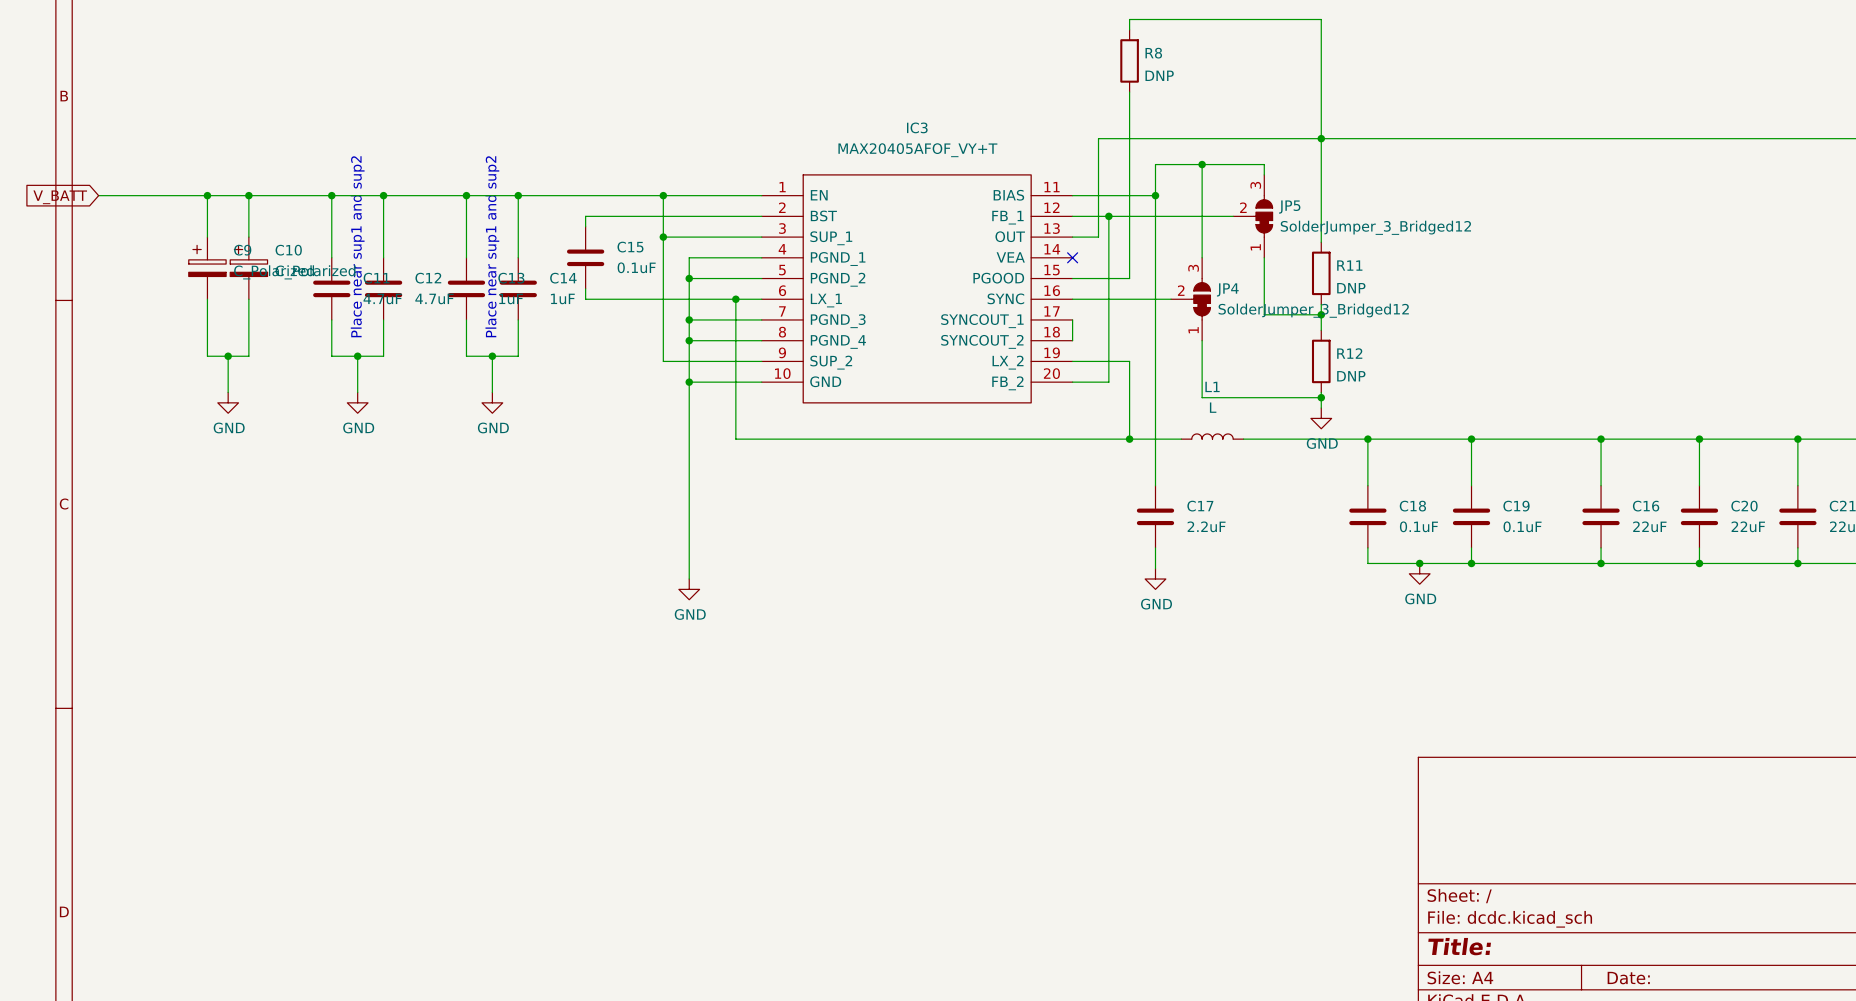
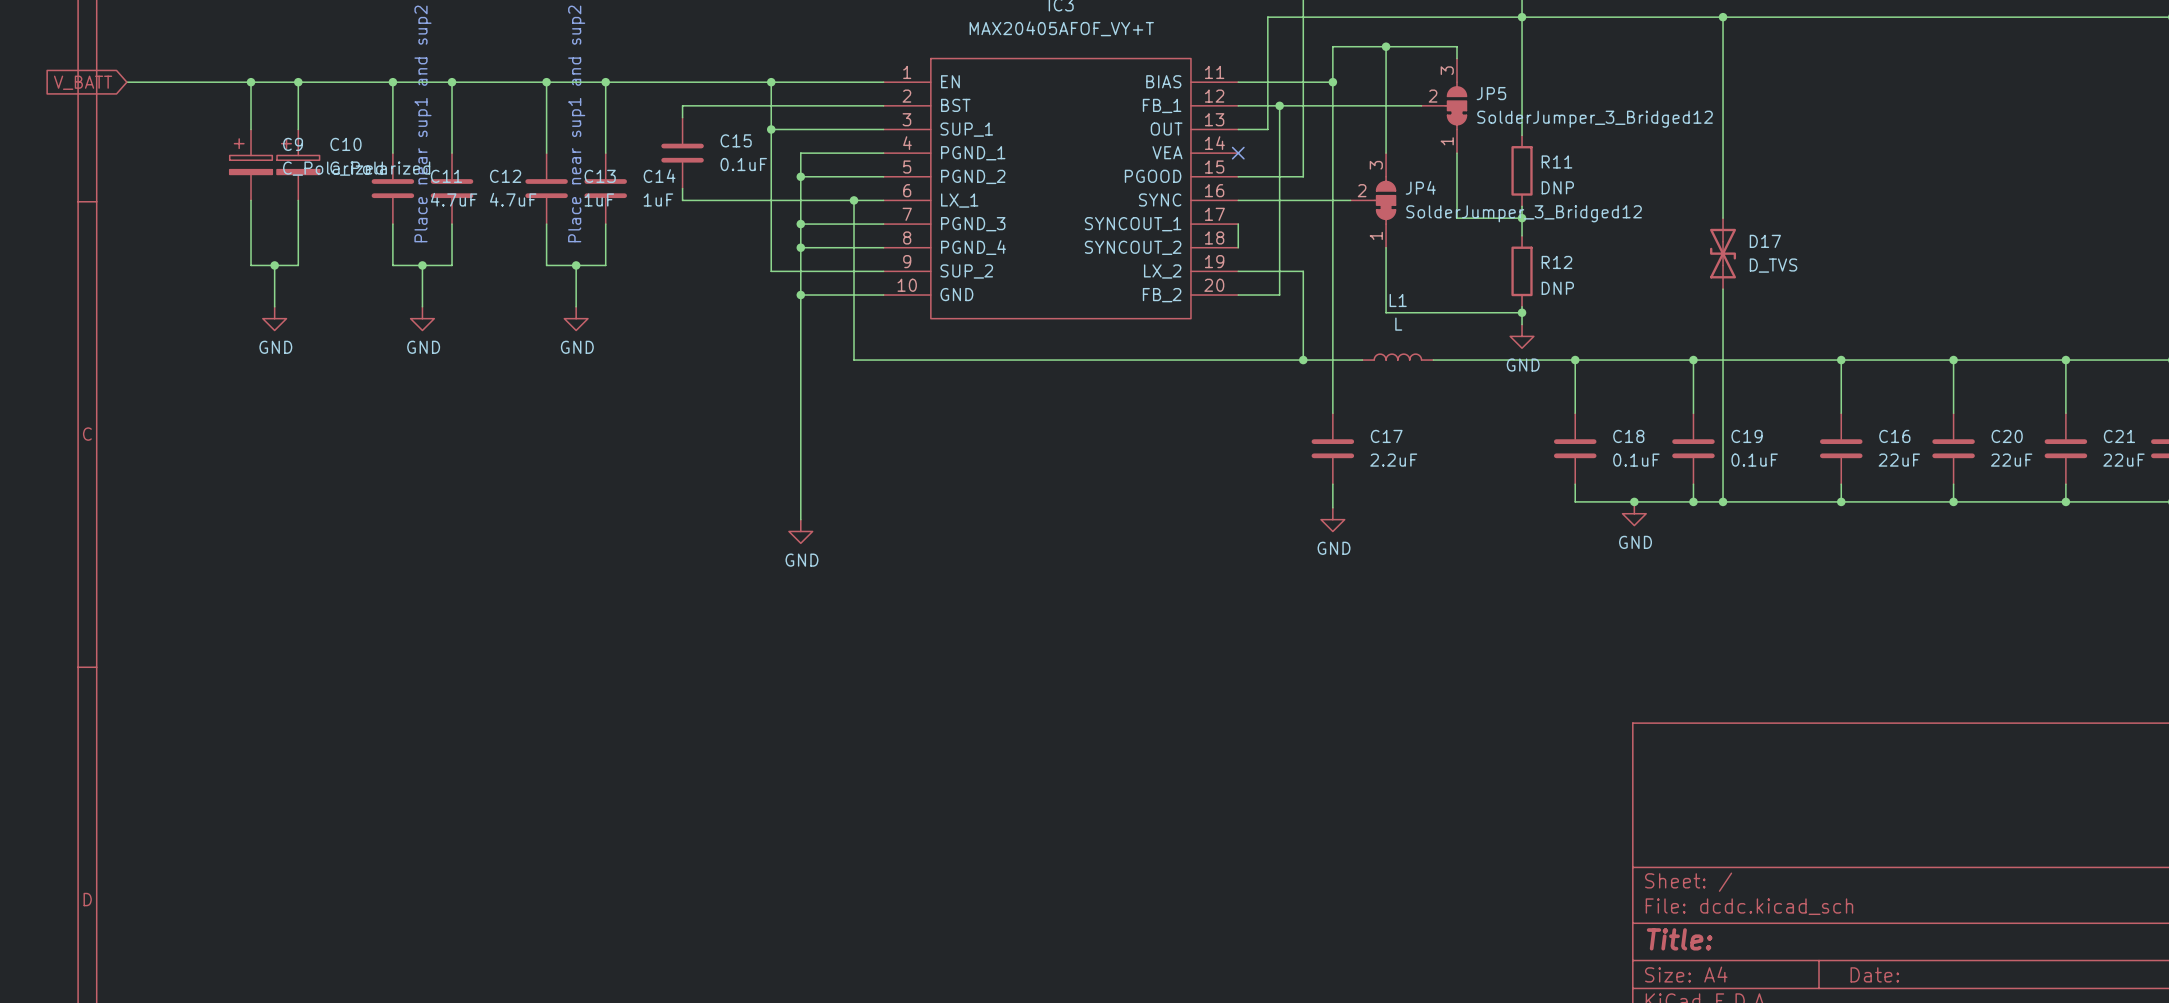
wire: none -> (1723, 17) (1723, 218)
junction: none -> (1723, 17)
D17: none -> D_TVS (1723, 253)
wire: none -> (1723, 289) (1723, 501)
junction: none -> (1723, 501)

